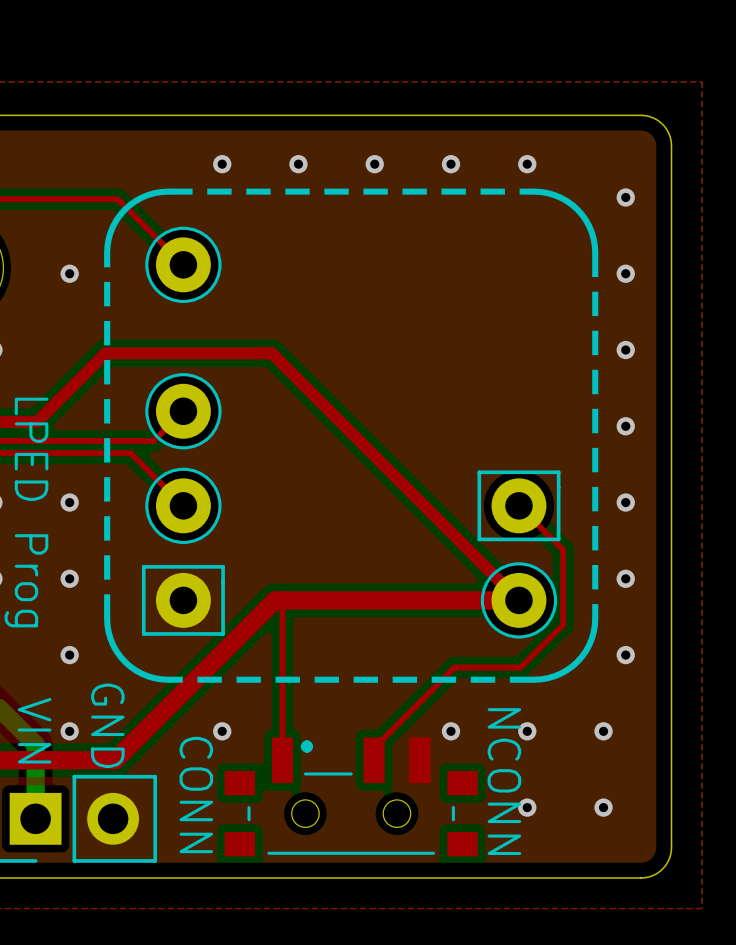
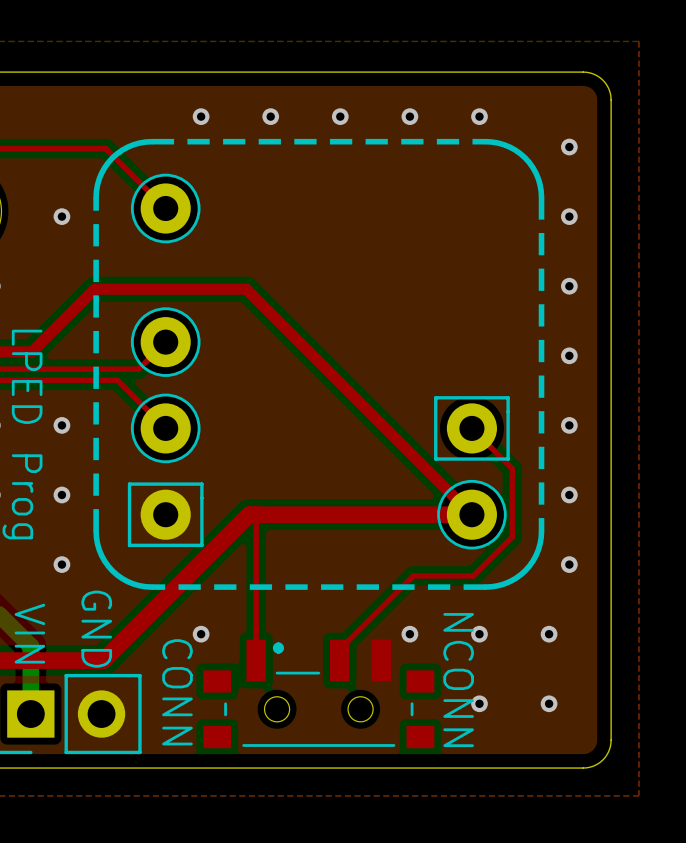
via: (69, 731) -> none

